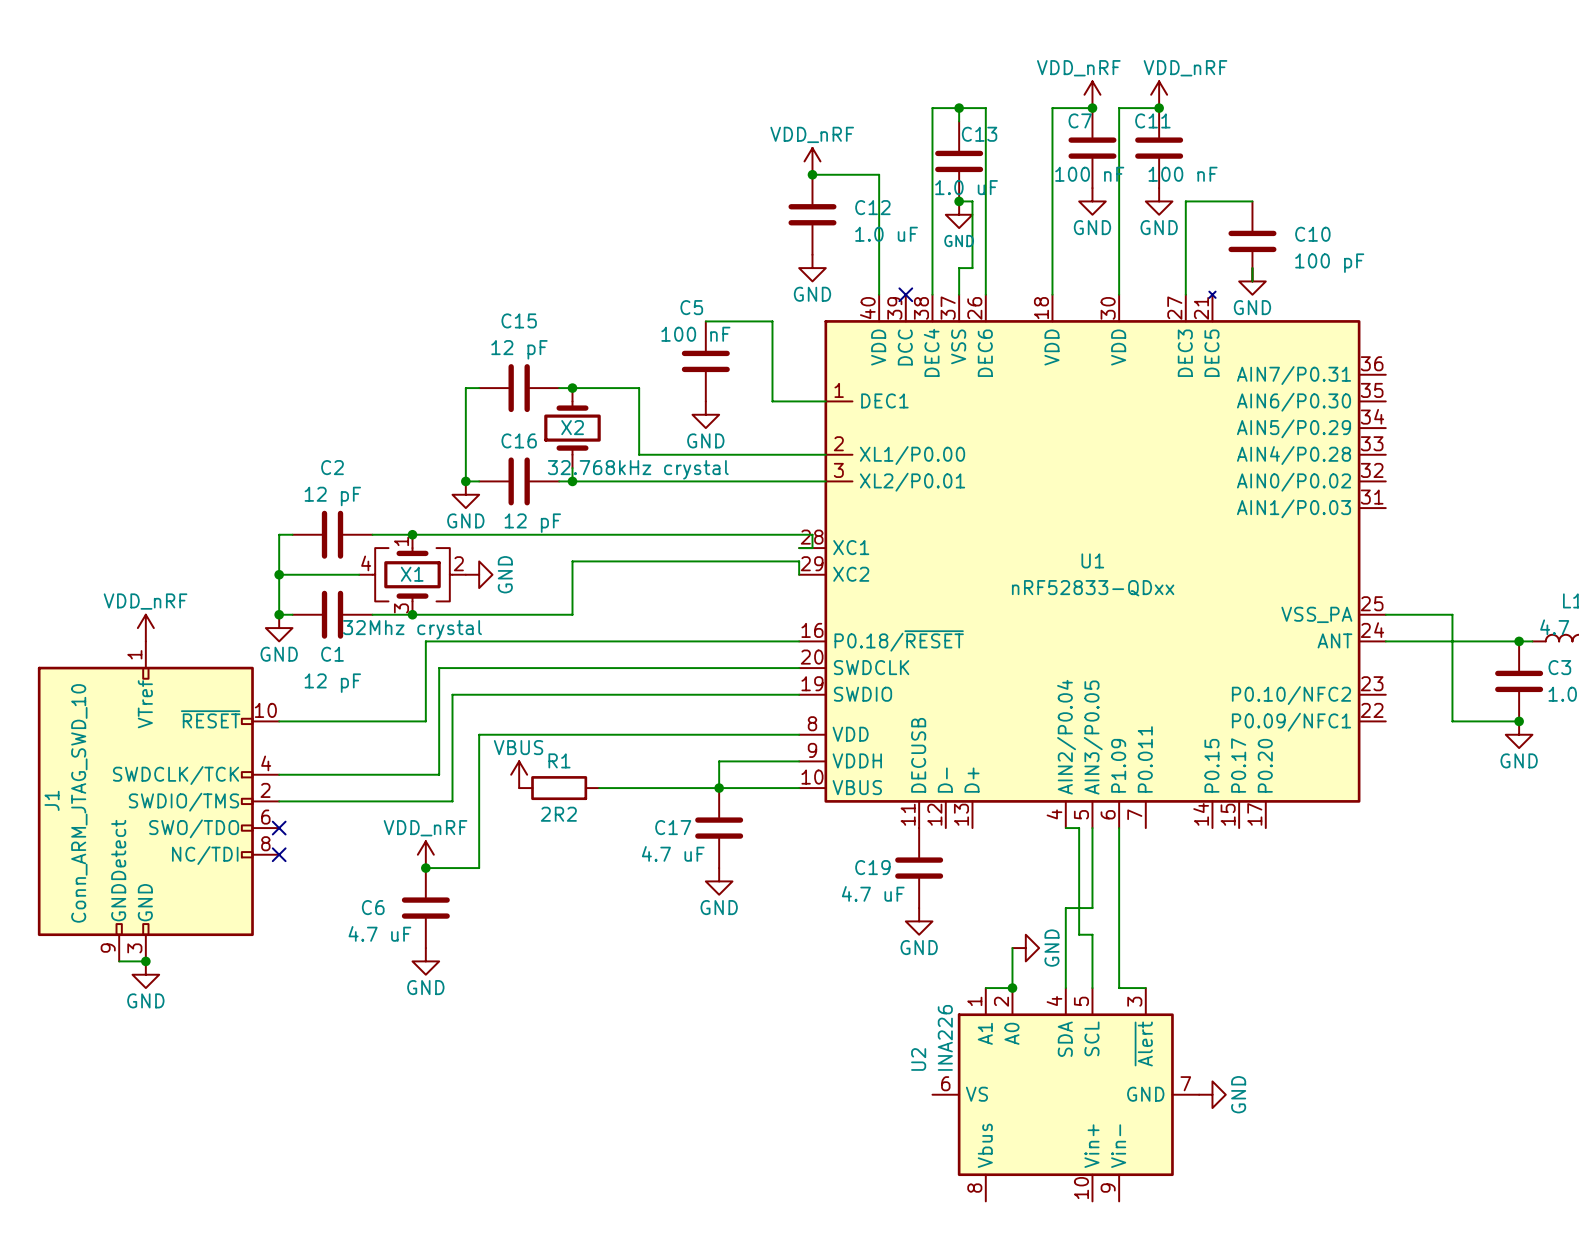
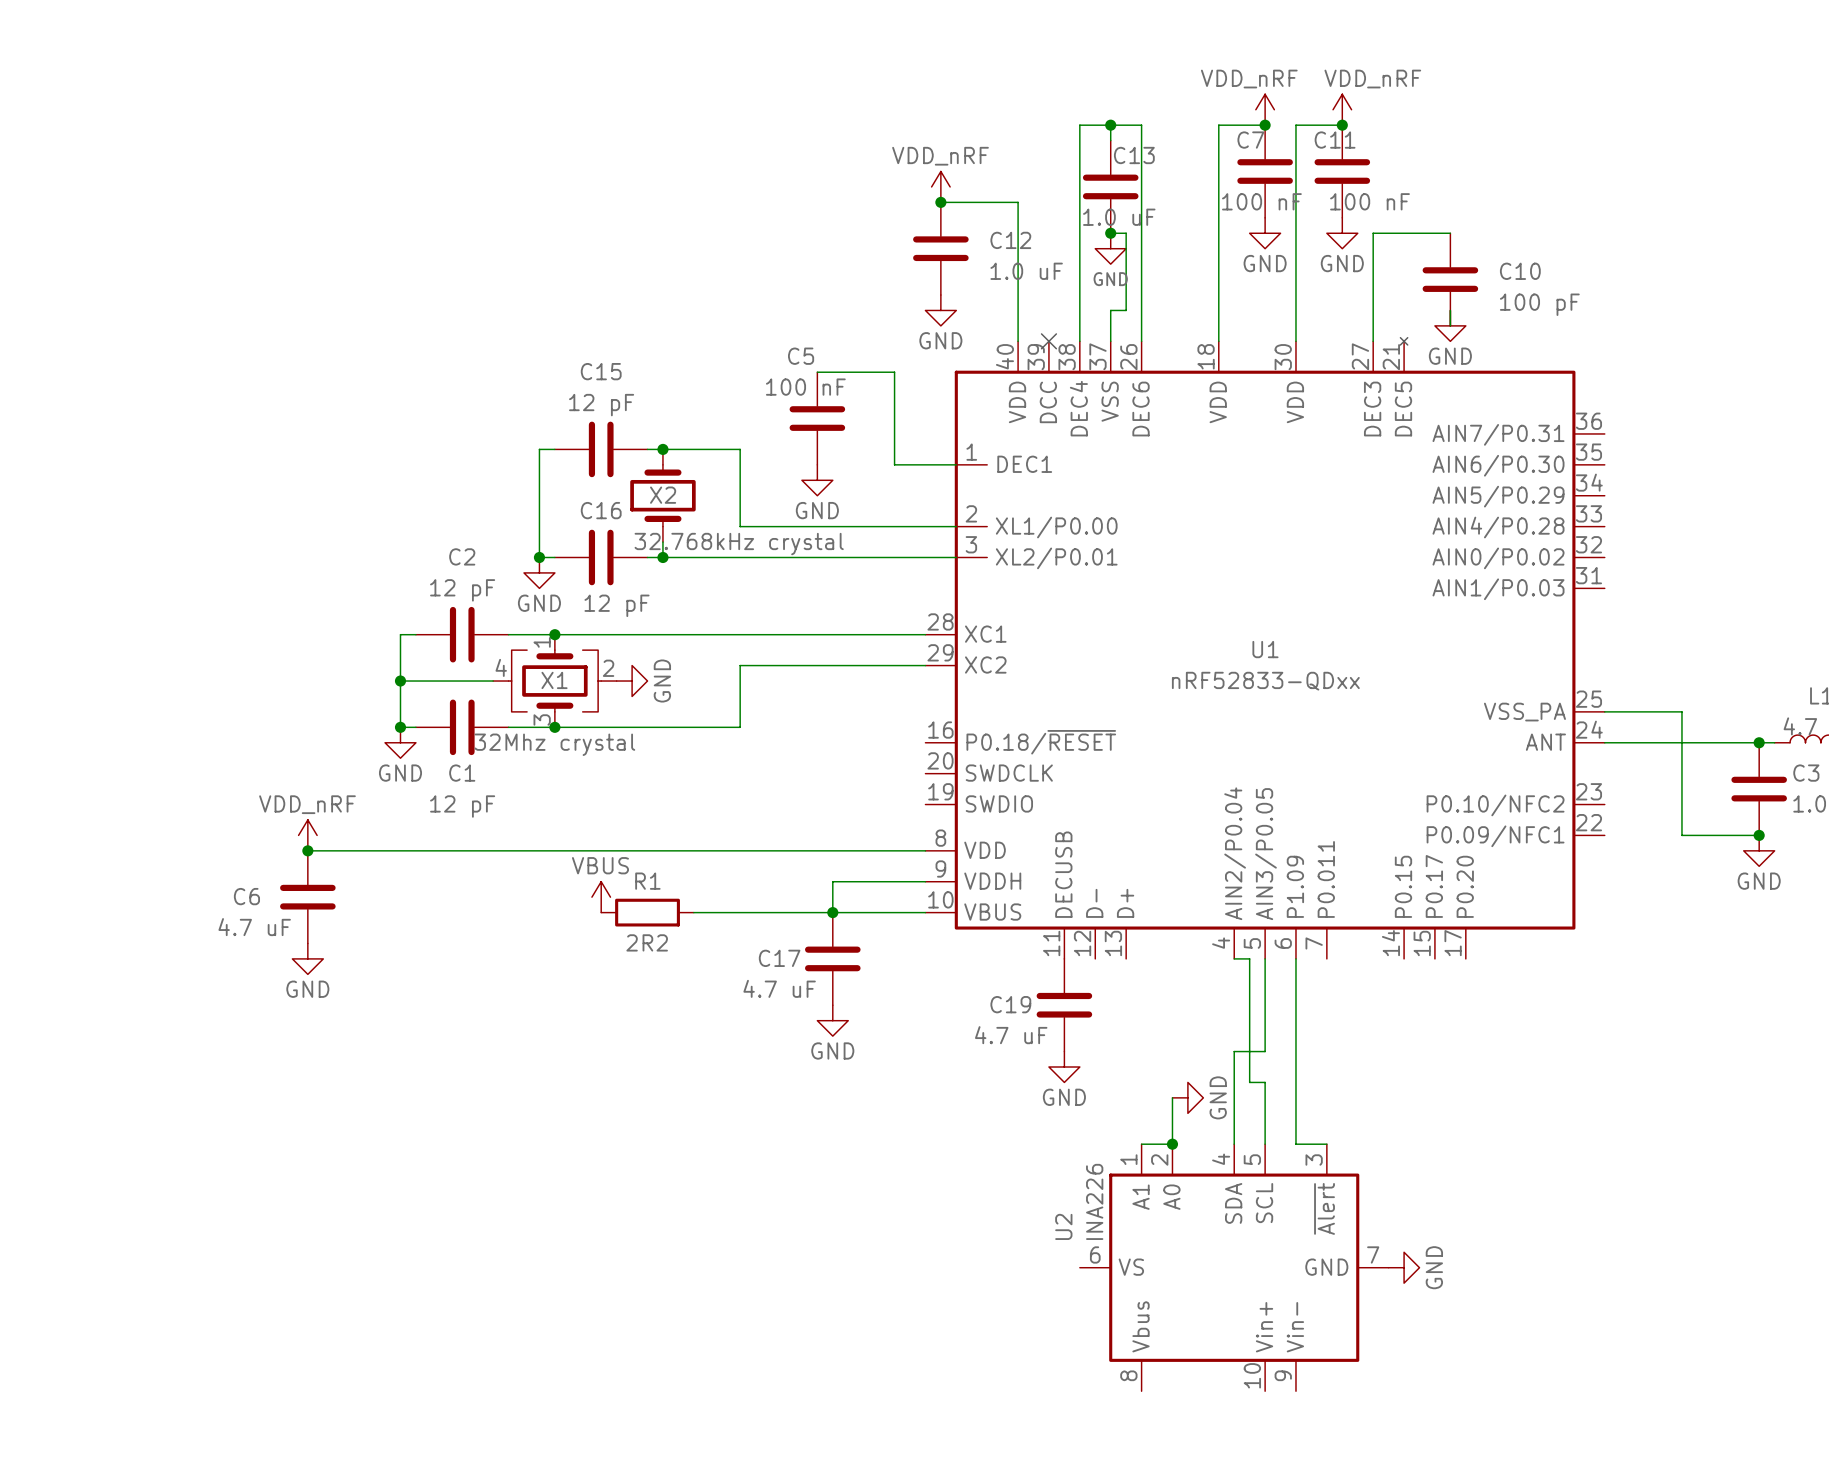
wire: (292, 534) (279, 534) (279, 614) (292, 614) -> (415, 634) (400, 634) (400, 727) (415, 727)
C2 position: (332, 534) -> (462, 634)
wire: (372, 534) (812, 534) (812, 548) (799, 548) -> (508, 634) (925, 634)
junction: (412, 534) -> none
junction: none -> (554, 634)
wire: (279, 574) (359, 574) -> (400, 681) (493, 681)
junction: (279, 574) -> none
X1 position: (412, 574) -> (554, 681)
power symbol position: GND (479, 574) -> GND (632, 681)
wire: (799, 574) (799, 561) (572, 561) (572, 614) (372, 614) -> (925, 665) (740, 665) (740, 727) (508, 727)
junction: none -> (400, 681)
junction: (279, 614) -> none
C1 position: (332, 614) -> (462, 727)
junction: (412, 614) -> none
power symbol: VDD_nRF (145, 628) -> none
power symbol position: GND (279, 628) -> GND (400, 742)
junction: none -> (400, 727)
junction: none -> (554, 727)
wire: (799, 641) (425, 641) (425, 721) (279, 721) -> none
wire: (799, 668) (439, 668) (439, 774) (279, 774) -> none
wire: (799, 694) (452, 694) (452, 801) (279, 801) -> none
power symbol: none -> VDD_nRF (307, 835)
junction: none -> (307, 850)
wire: (479, 734) (479, 868) (425, 868) -> (554, 850) (307, 850)
J1: Conn_ARM_JTAG_SWD_10 (158, 801) -> none
power symbol: none -> GND (307, 958)
no-connect mark: (279, 828) -> none
no-connect mark: (279, 854) -> none
power symbol: VDD_nRF (425, 854) -> none
junction: (425, 868) -> none
C6 position: (425, 908) -> (307, 897)
wire: (119, 961) (145, 961) -> none
junction: (145, 961) -> none
power symbol: GND (425, 961) -> none
power symbol: GND (145, 974) -> none

